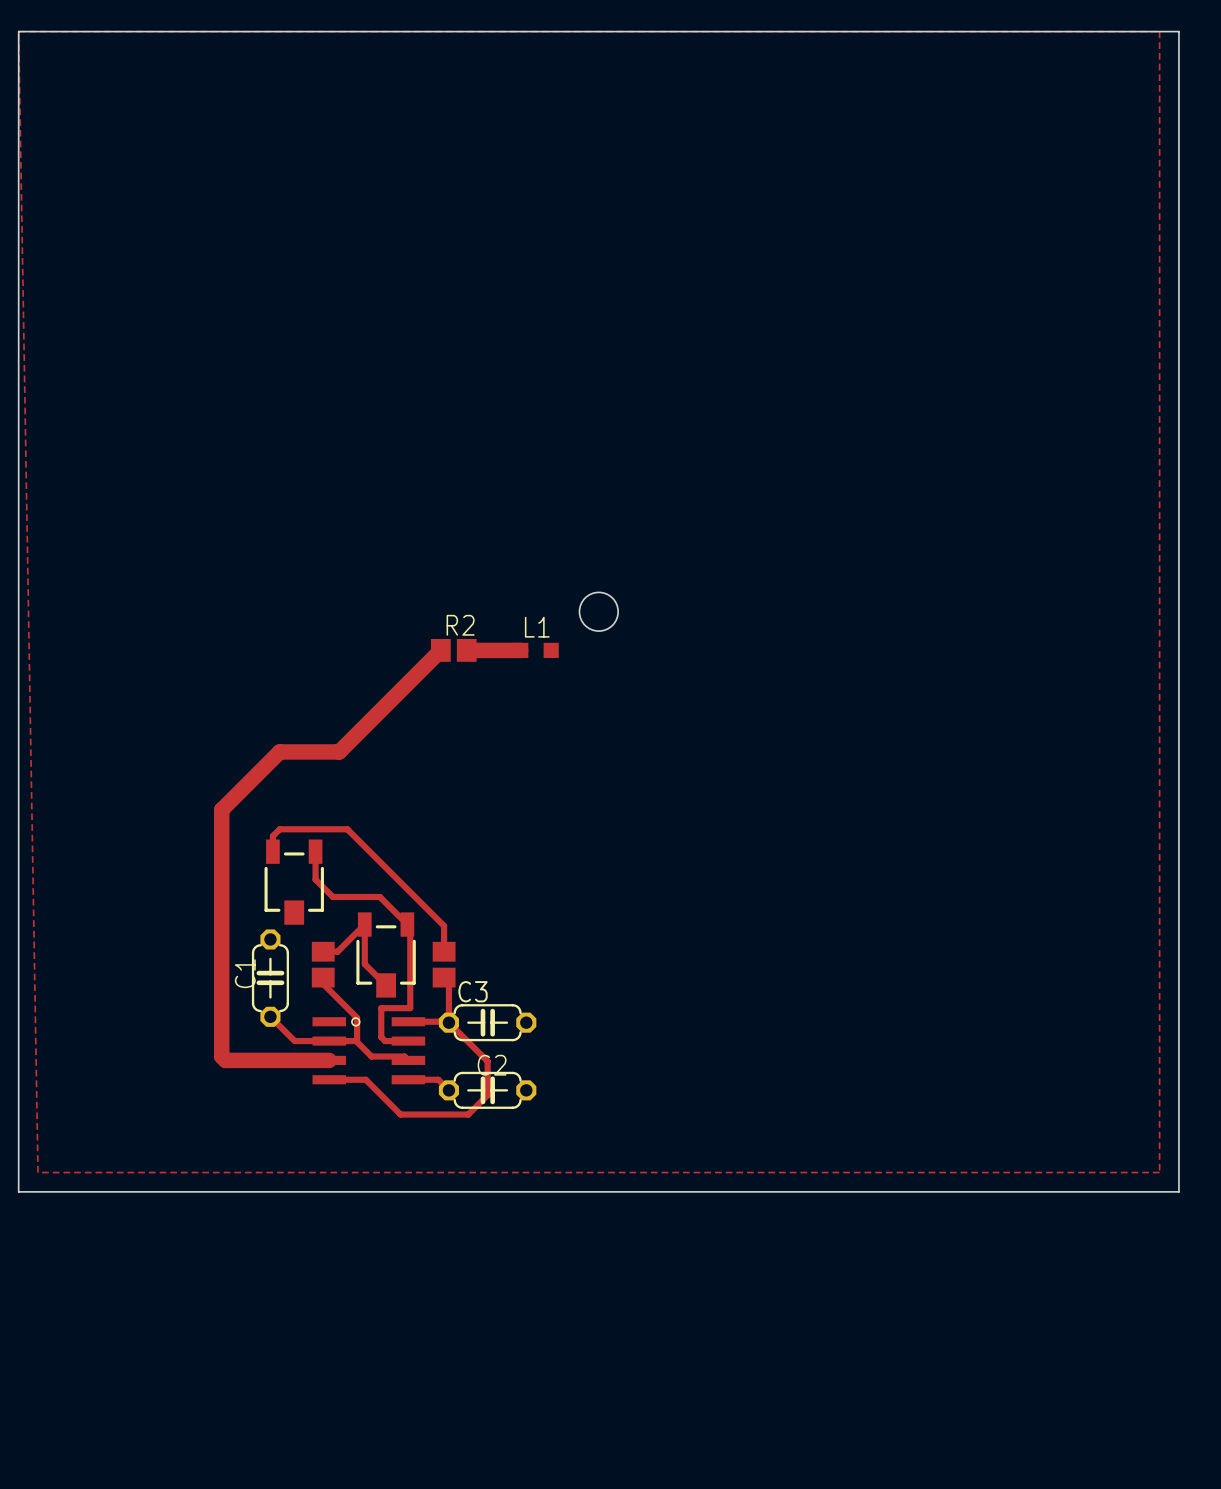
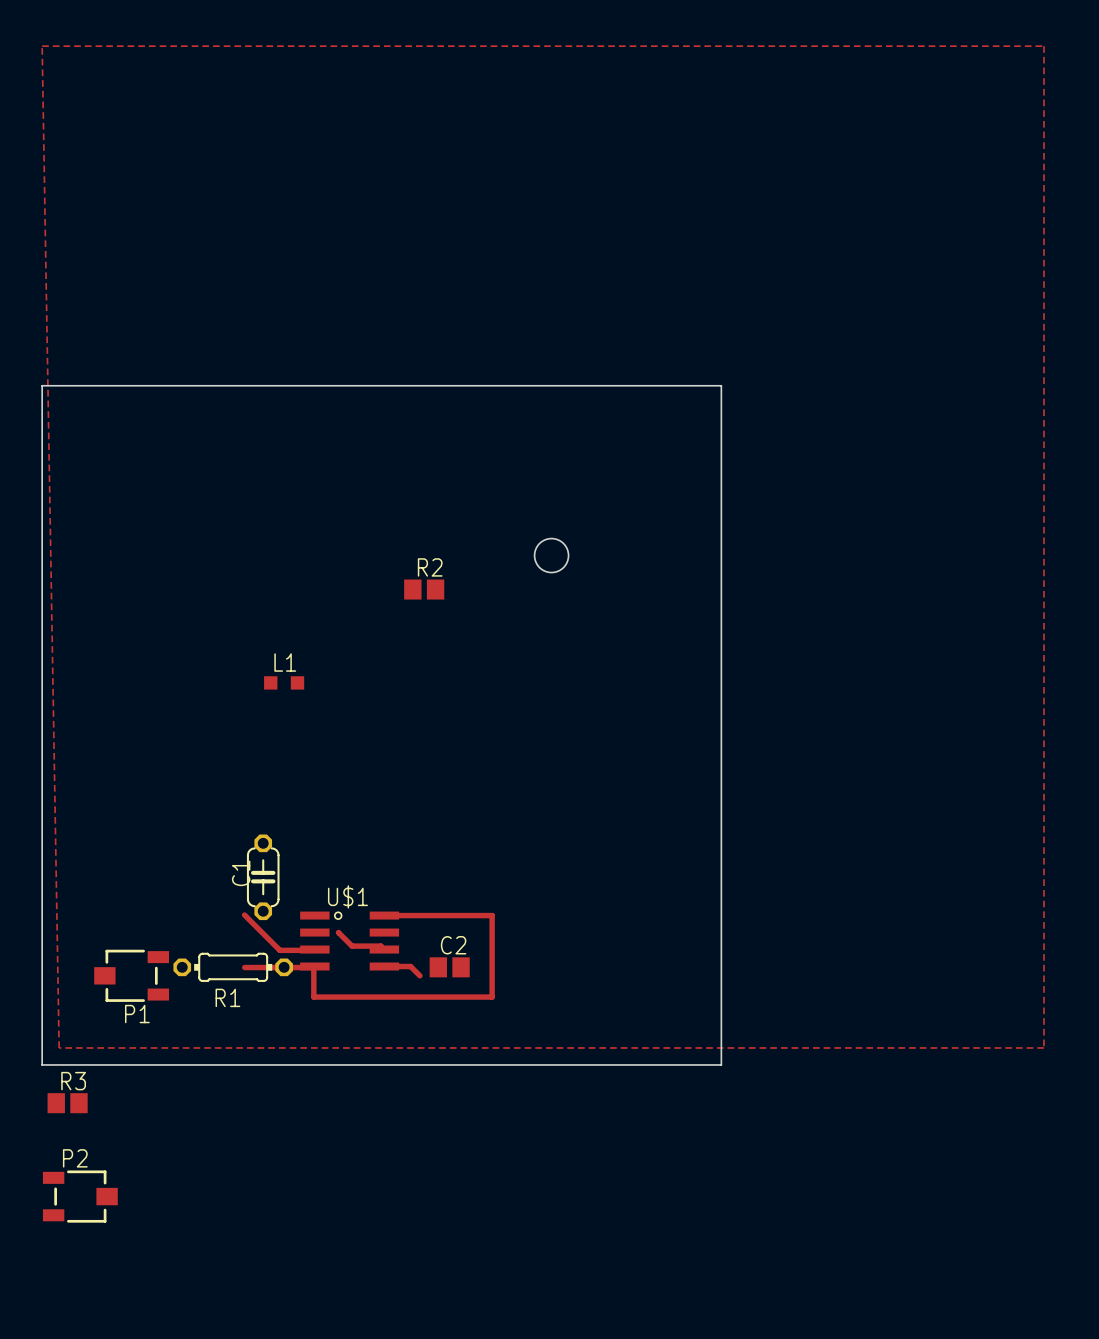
board edge: (18, 418) (18, 31) (1178, 31) (1178, 1191) (792, 1191) -> (42, 385) (721, 385) (721, 1064)
top track: (440, 650) (339, 751) (279, 751) (221, 809) (221, 1056) (225, 1060) (329, 1060) -> (244, 915) (279, 950) (314, 949)
top track: (466, 650) (520, 650) -> none
L1 position: (535, 650) -> (284, 682)
top track: (272, 851) (272, 836) (279, 829) (347, 829) (444, 925) (444, 951) -> none
top track: (315, 851) (315, 879) (332, 896) (379, 896) (407, 924) (410, 932) (410, 1008) (381, 1008) (381, 1037) (385, 1041) (408, 1041) -> none
part: (294, 882) -> none
top track: (323, 951) (337, 951) (364, 924) (364, 964) (386, 985) -> none
part: (386, 954) -> none
part: (323, 964) -> none
part: (444, 964) -> none
top track: (323, 977) (323, 984) (357, 1017) (356, 1041) (294, 1041) (270, 1016) -> none
top track: (444, 977) (448, 982) (448, 1022) -> none
U$1 name: none -> U$1 (347, 896)
top track: (448, 1021) (487, 1061) (487, 1095) (468, 1114) -> (419, 915) (492, 915) (492, 997) (436, 997)
C3: (487, 1022) -> none
C2 footprint: [438, 1071, 537, 1109] -> [429, 957, 470, 978]
top track: (329, 1079) (365, 1079) (400, 1114) -> (244, 967) (313, 967) (313, 997) (377, 997)
R1: none -> (233, 967)
P1: none -> (131, 975)
R3: none -> (67, 1103)
P2: none -> (80, 1196)

